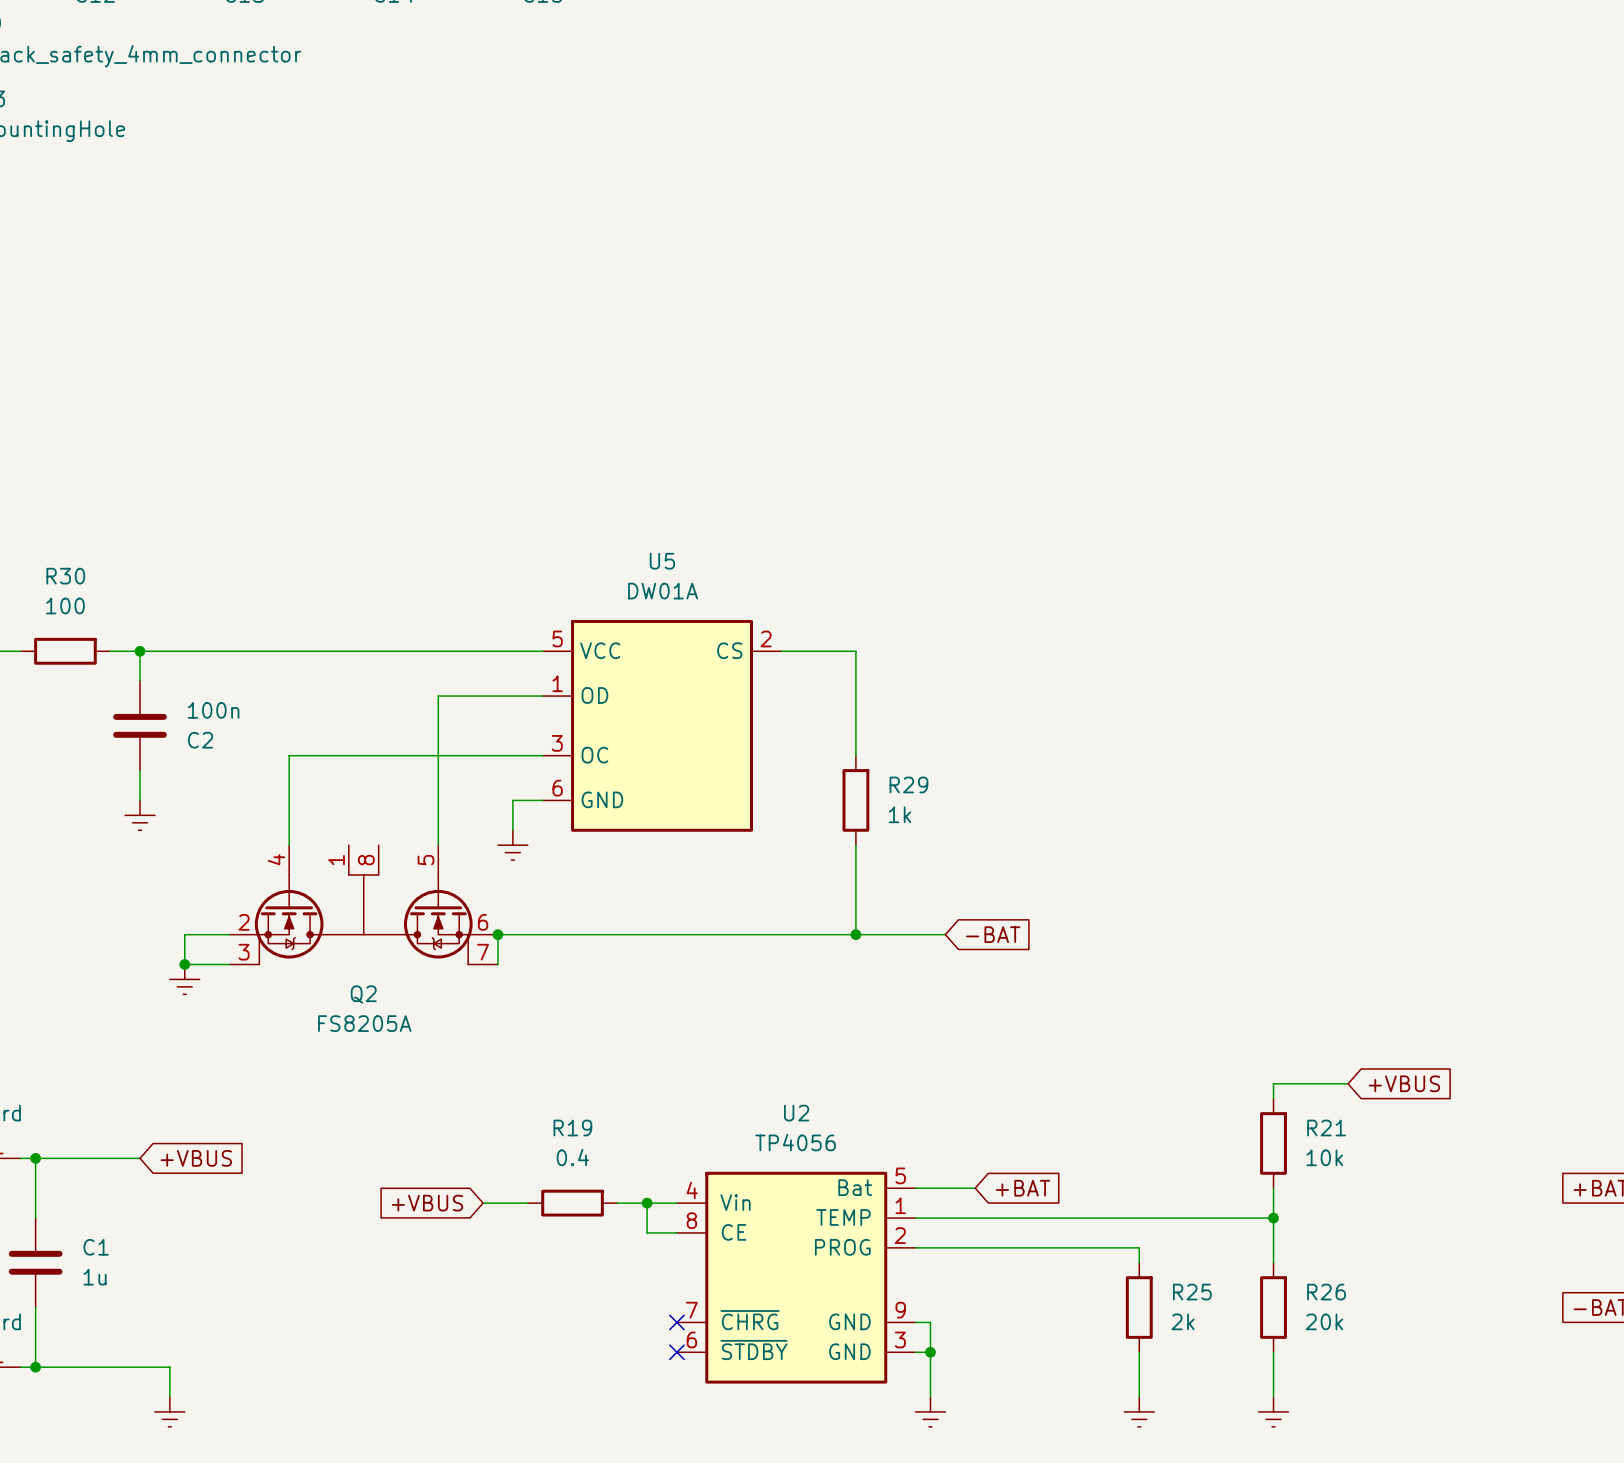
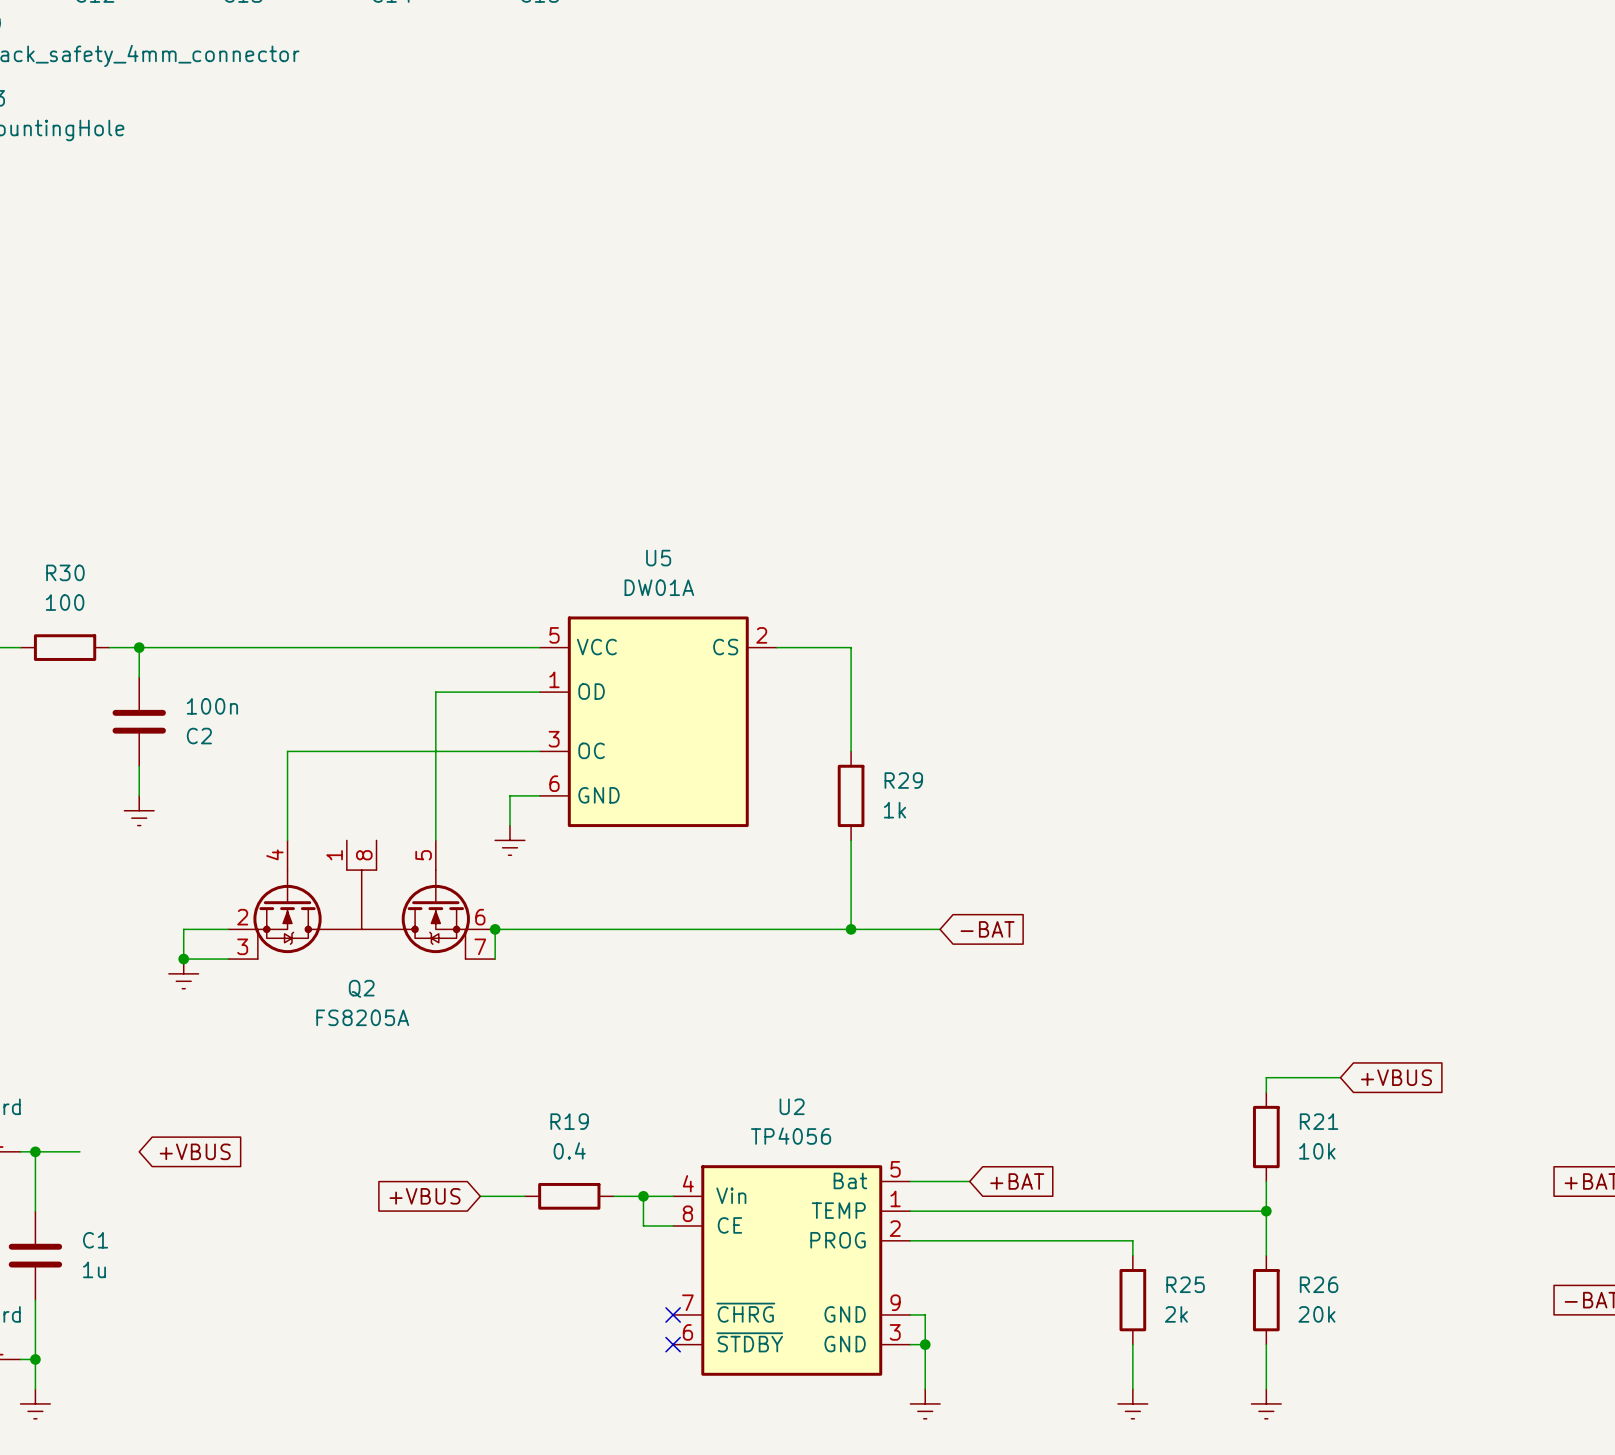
wire: (80, 1158) (140, 1158) -> none
wire: (35, 1367) (169, 1367) (169, 1397) -> (35, 1359) (35, 1389)
power symbol position: (169, 1411) -> (35, 1403)

